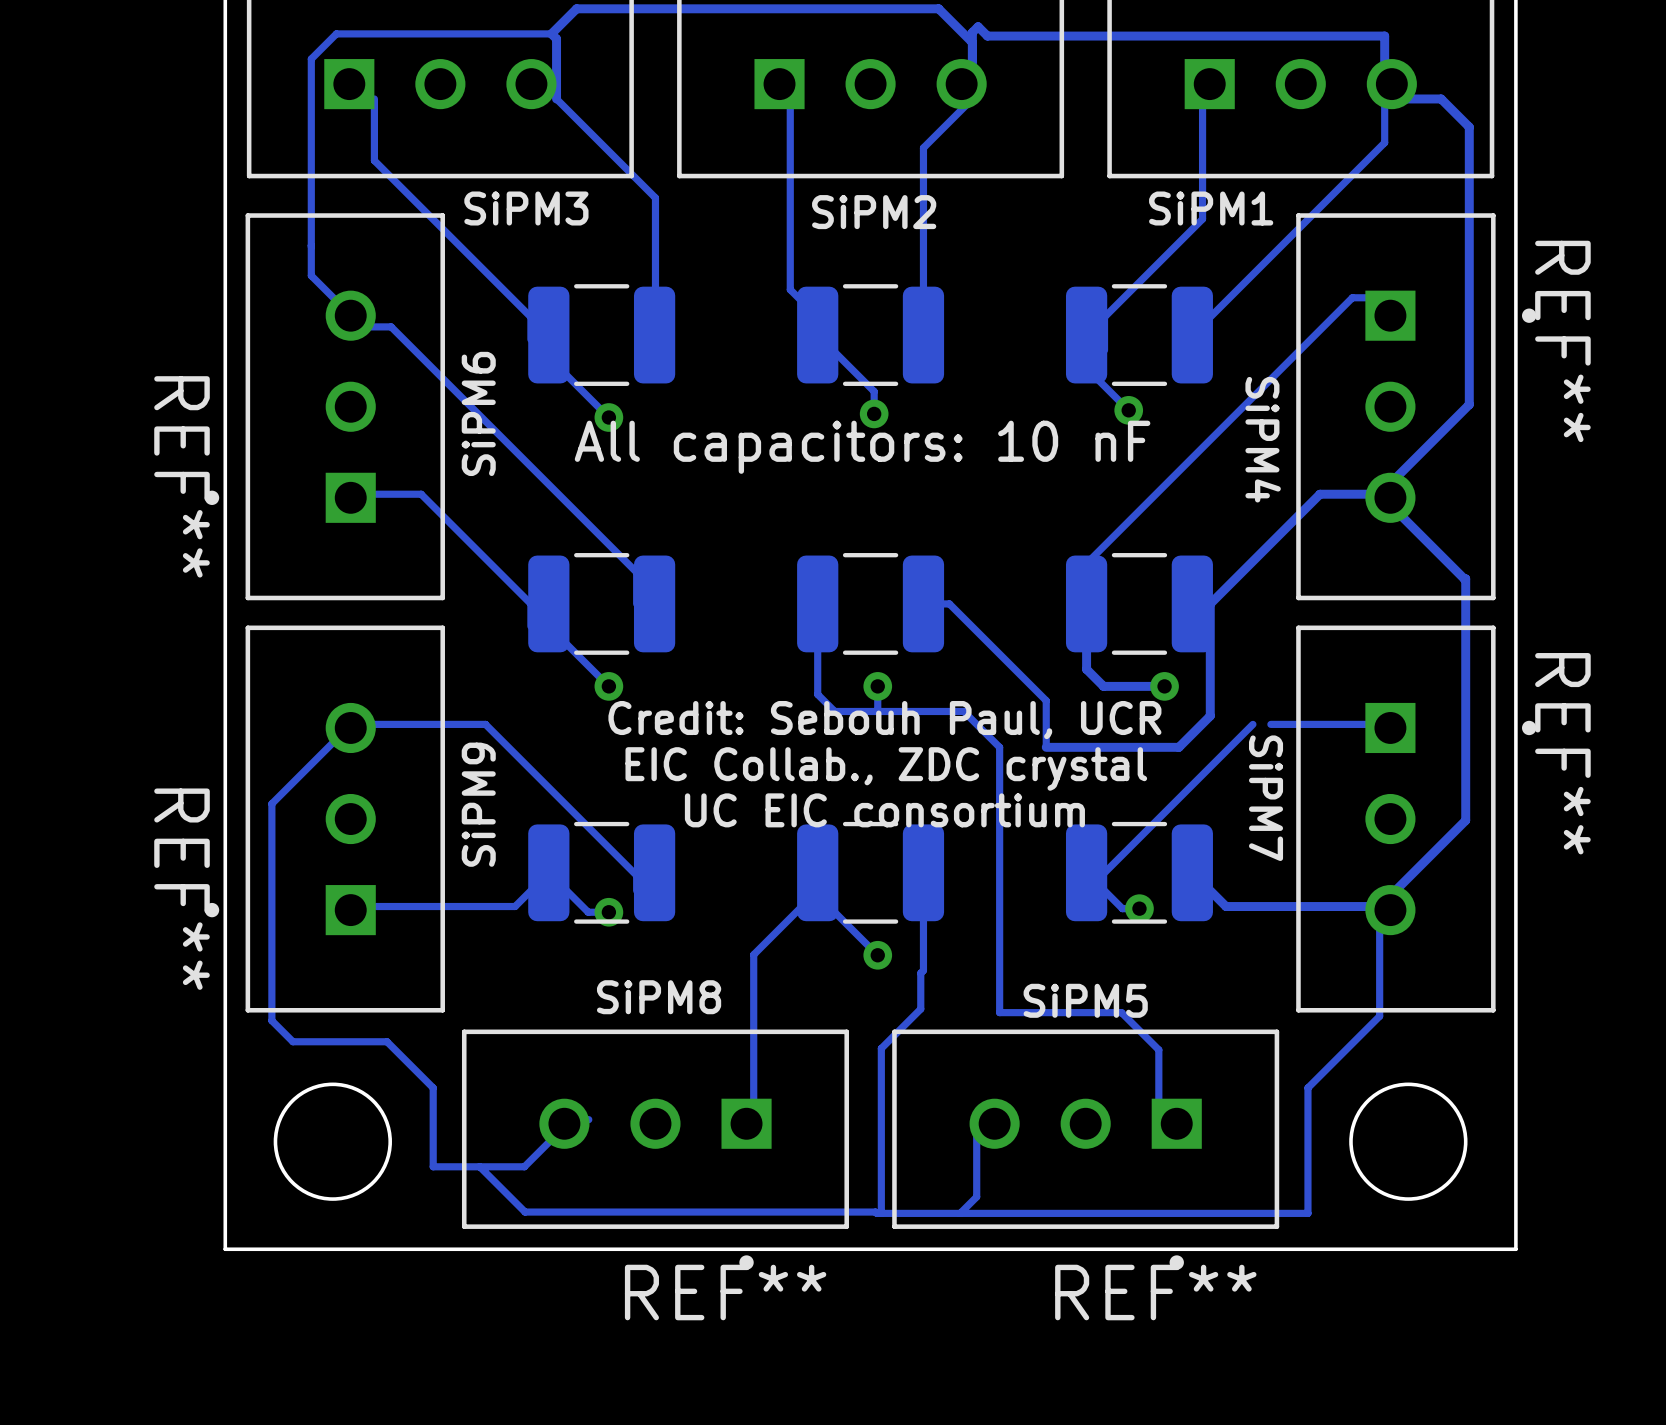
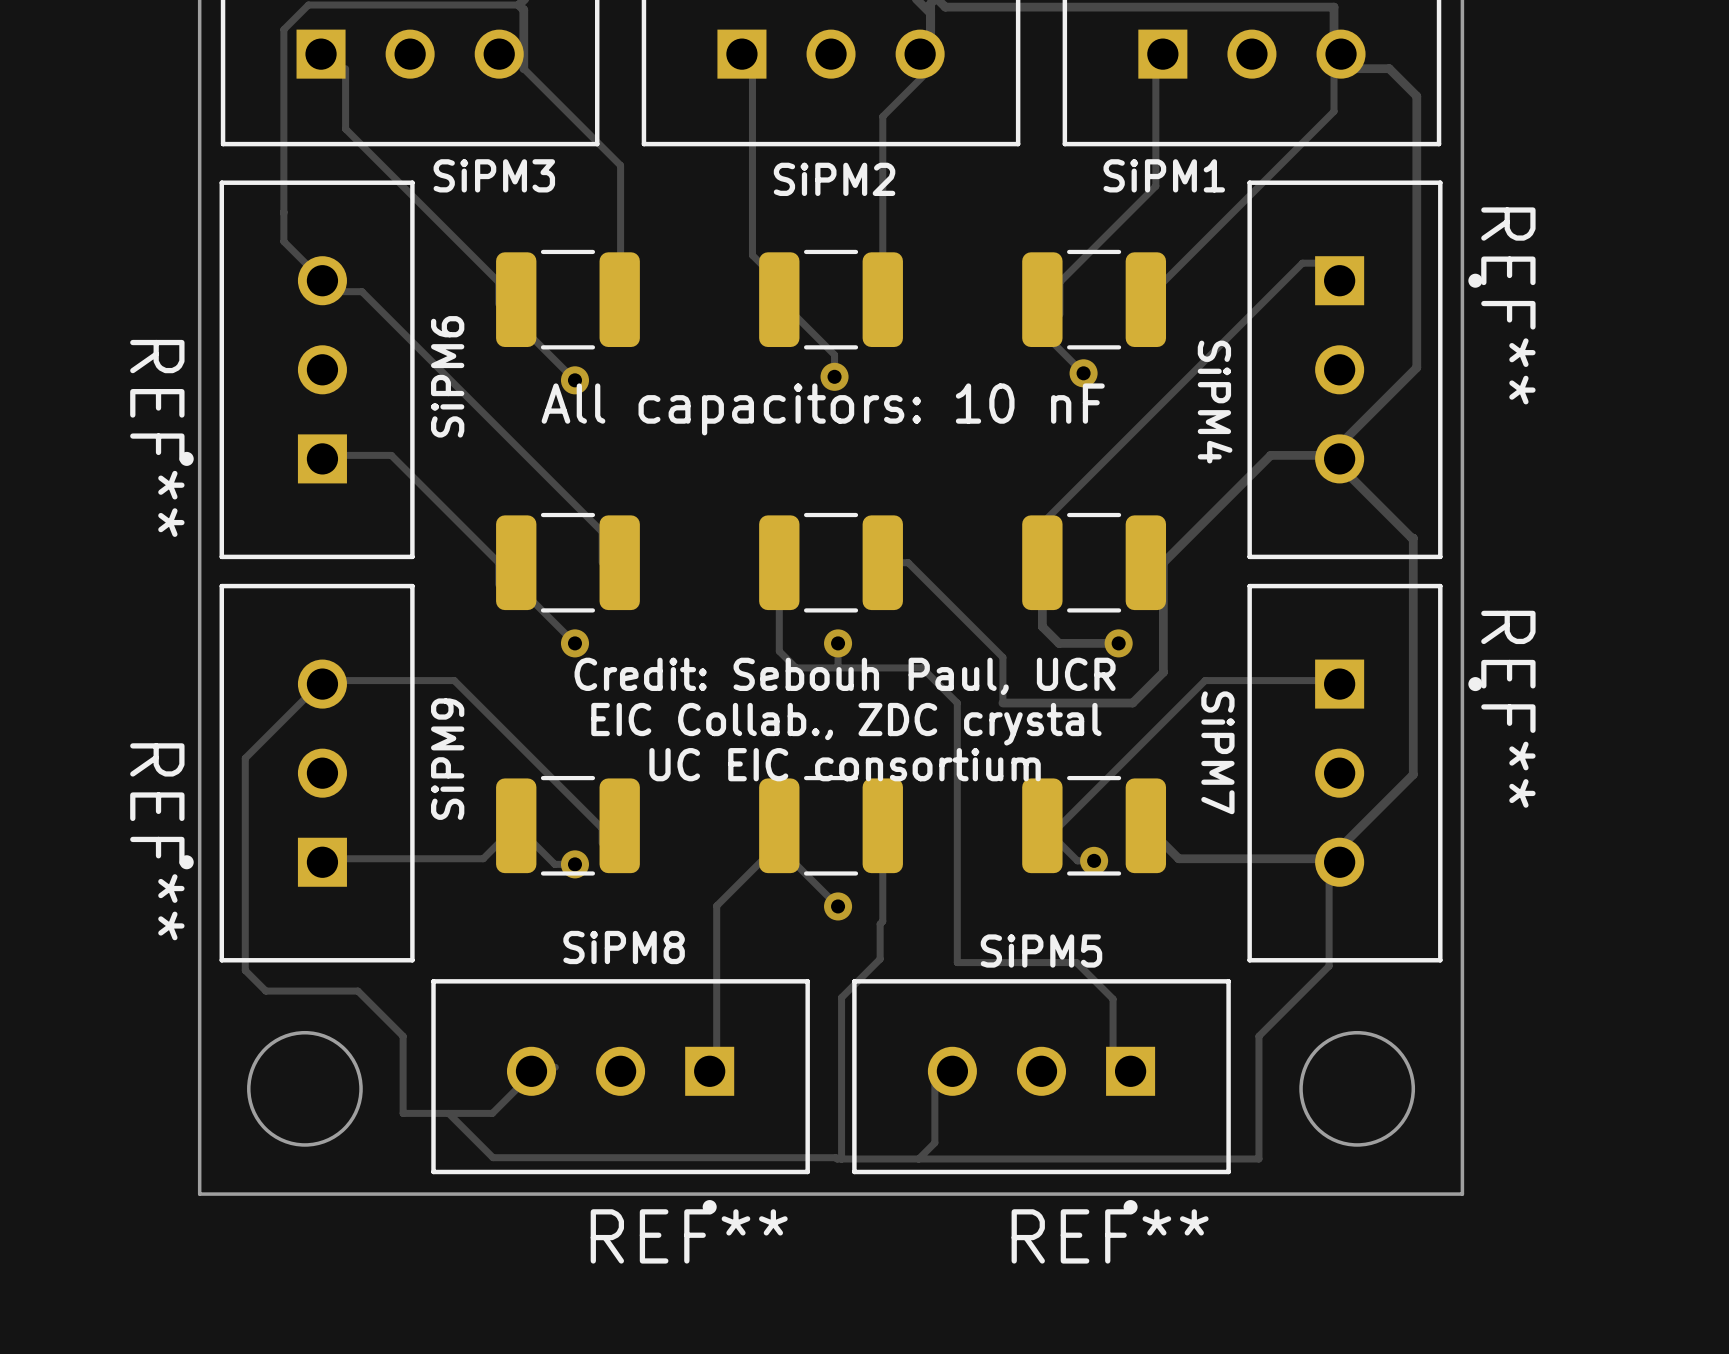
track: none -> (1222, 680) (1205, 680)

